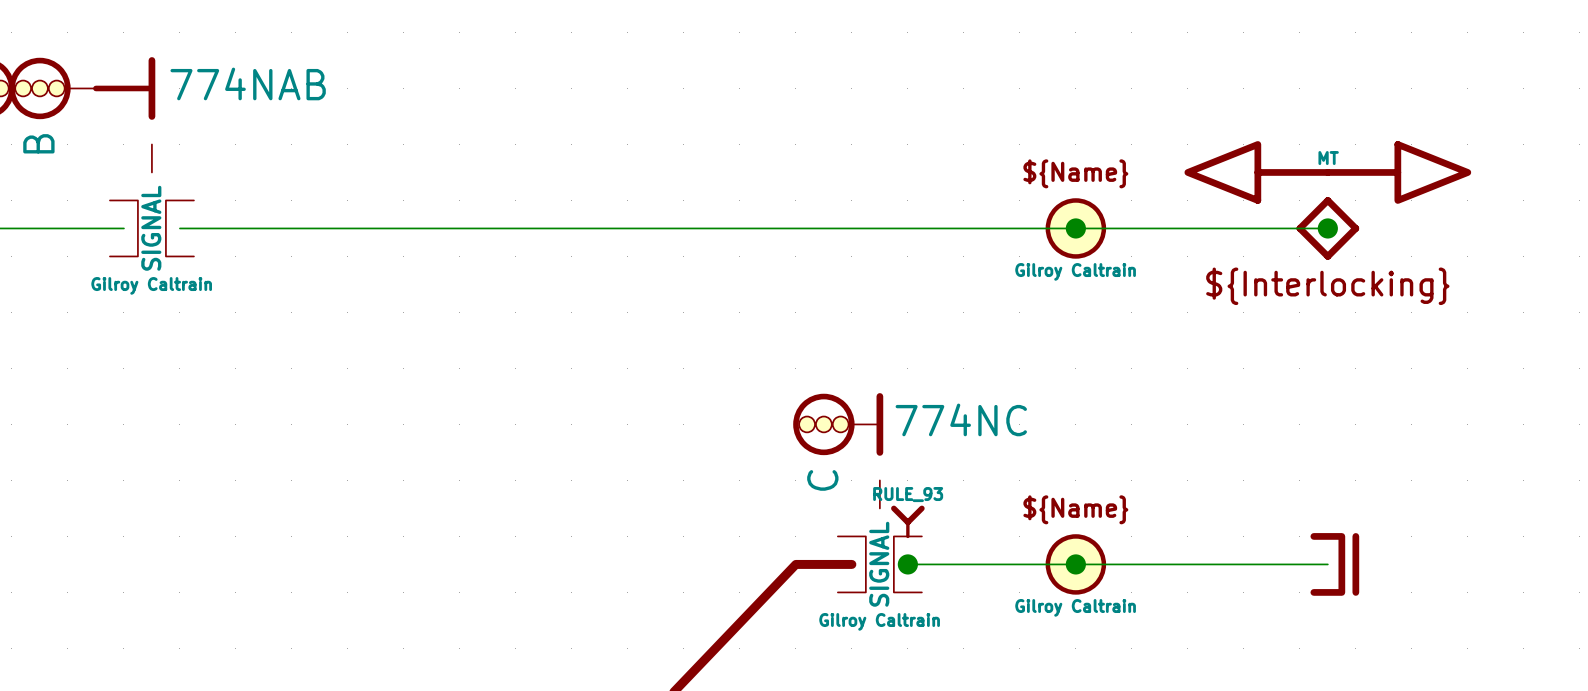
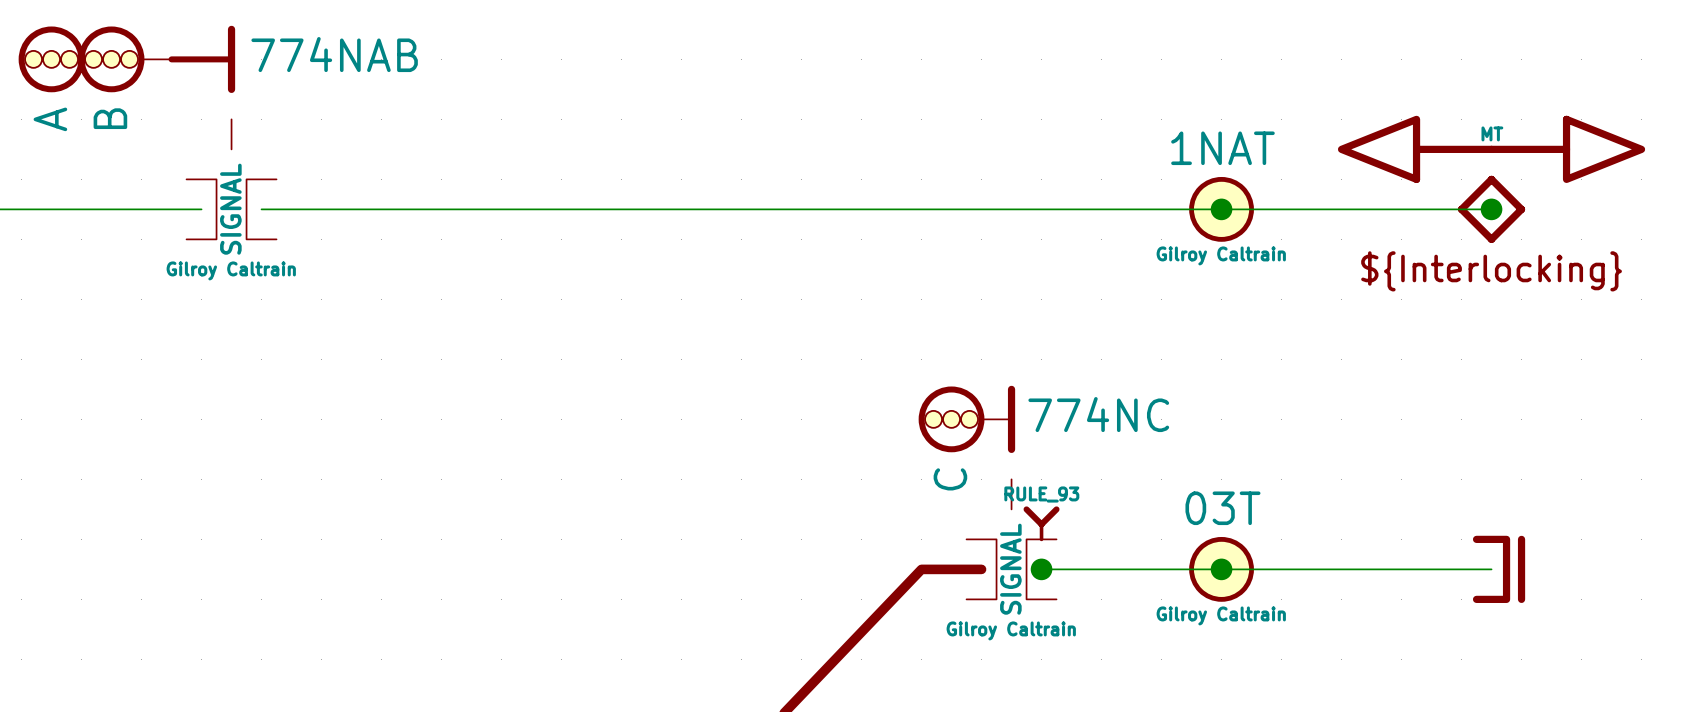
part value: none -> 1NAT (1222, 148)
part text: ${Name} (1075, 173) -> none
part value: none -> 03T (1222, 508)
part text: ${Name} (1075, 509) -> none

